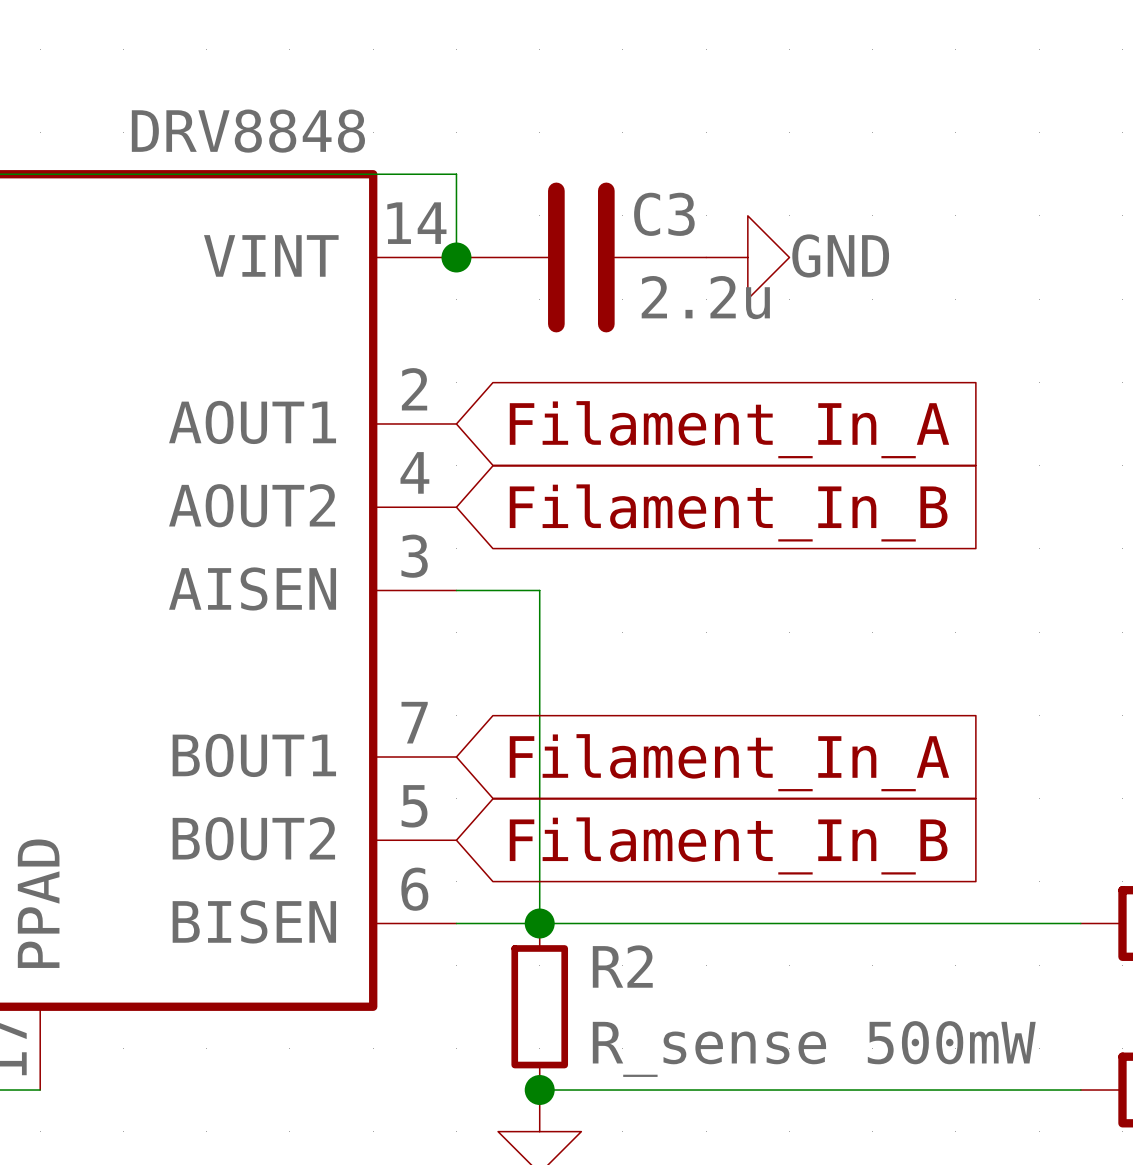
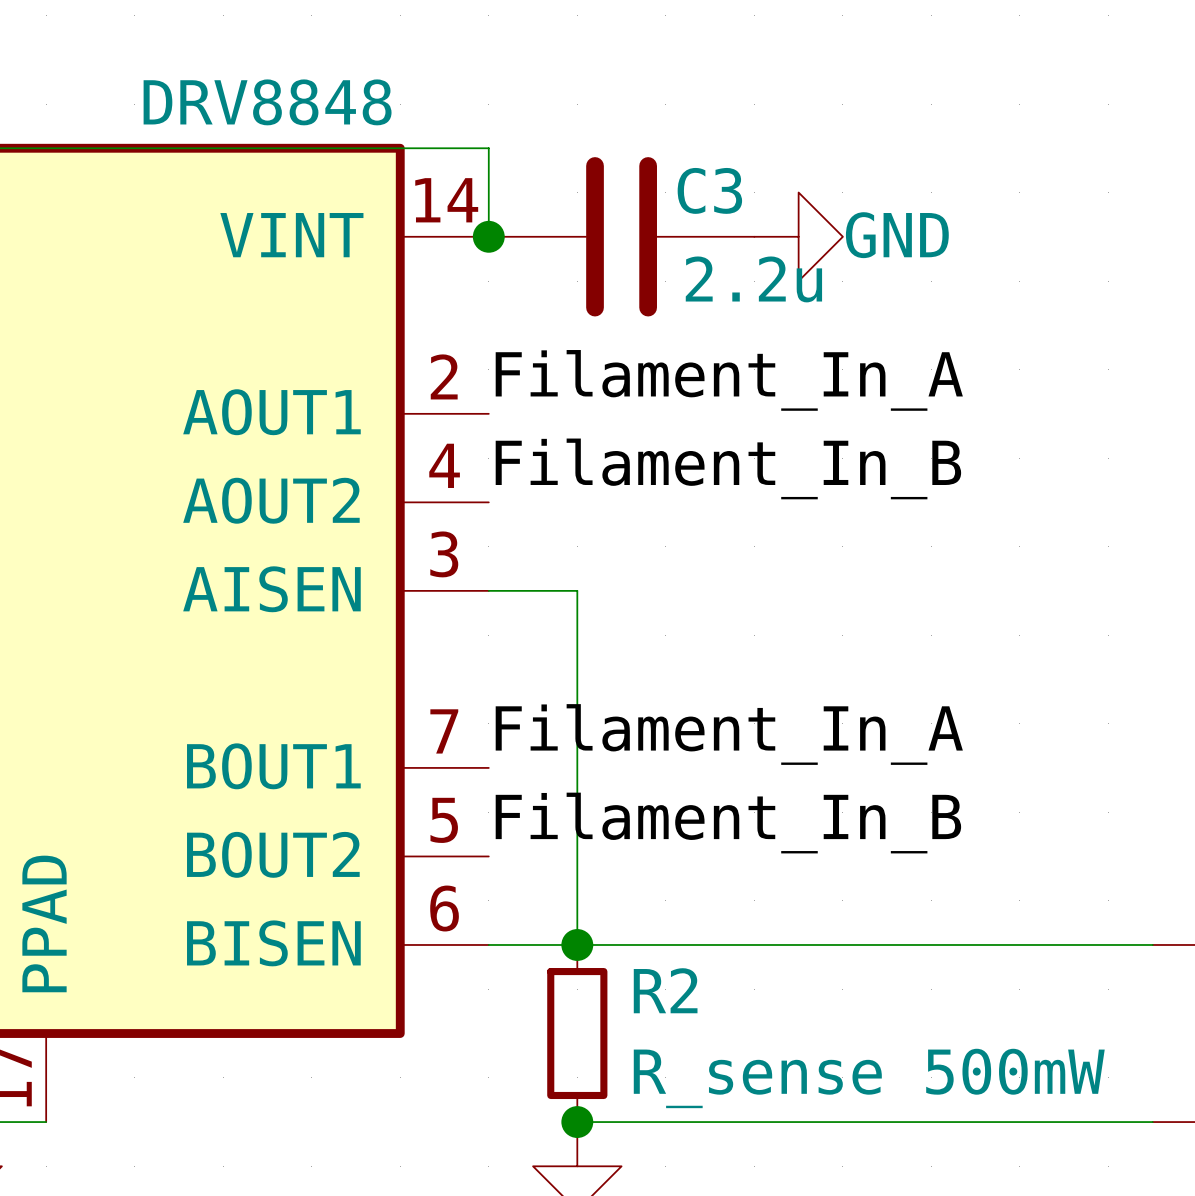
label: none -> Filament_In_A (729, 380)
global label: Filament_In_A (729, 429) -> none
label: none -> Filament_In_B (728, 468)
global label: Filament_In_B (728, 512) -> none
label: none -> Filament_In_A (729, 734)
global label: Filament_In_A (729, 762) -> none
label: none -> Filament_In_B (728, 823)
global label: Filament_In_B (728, 845) -> none

